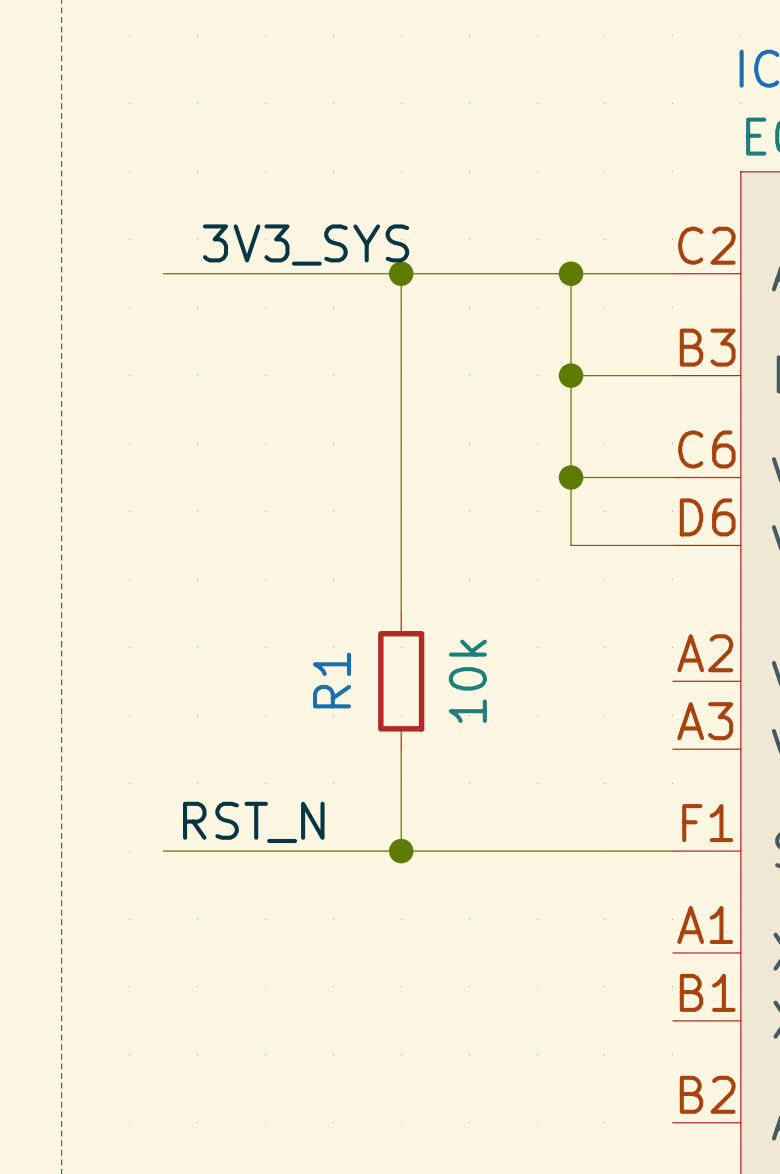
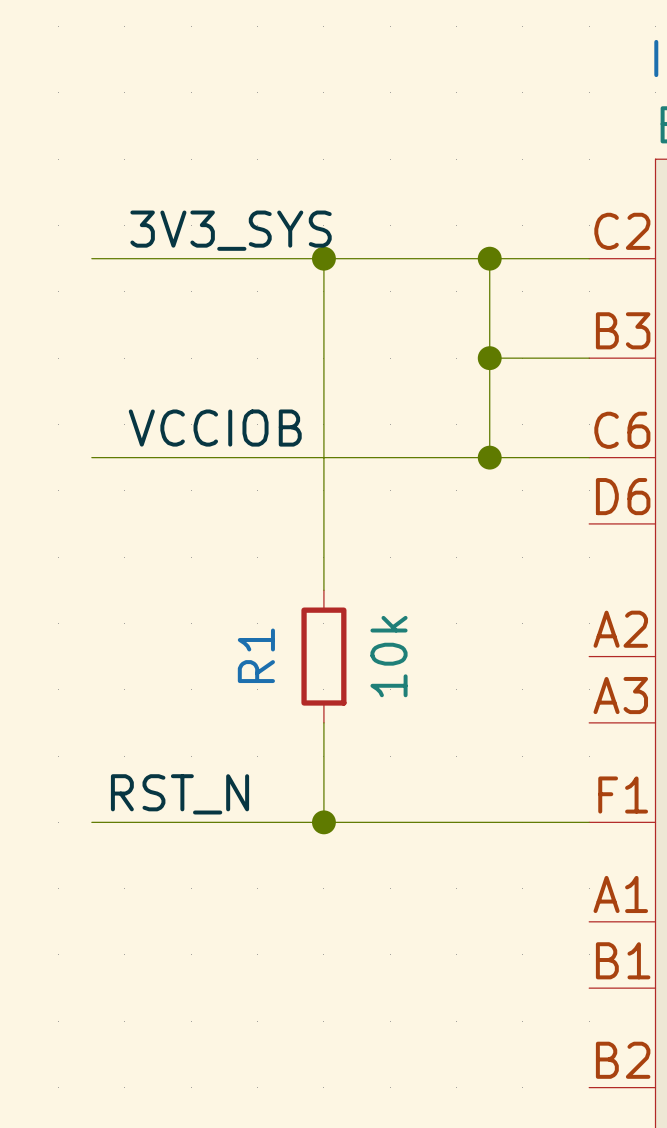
label: none -> VCCIOB (215, 428)
wire: (571, 477) (571, 545) (672, 545) -> (489, 457) (91, 457)

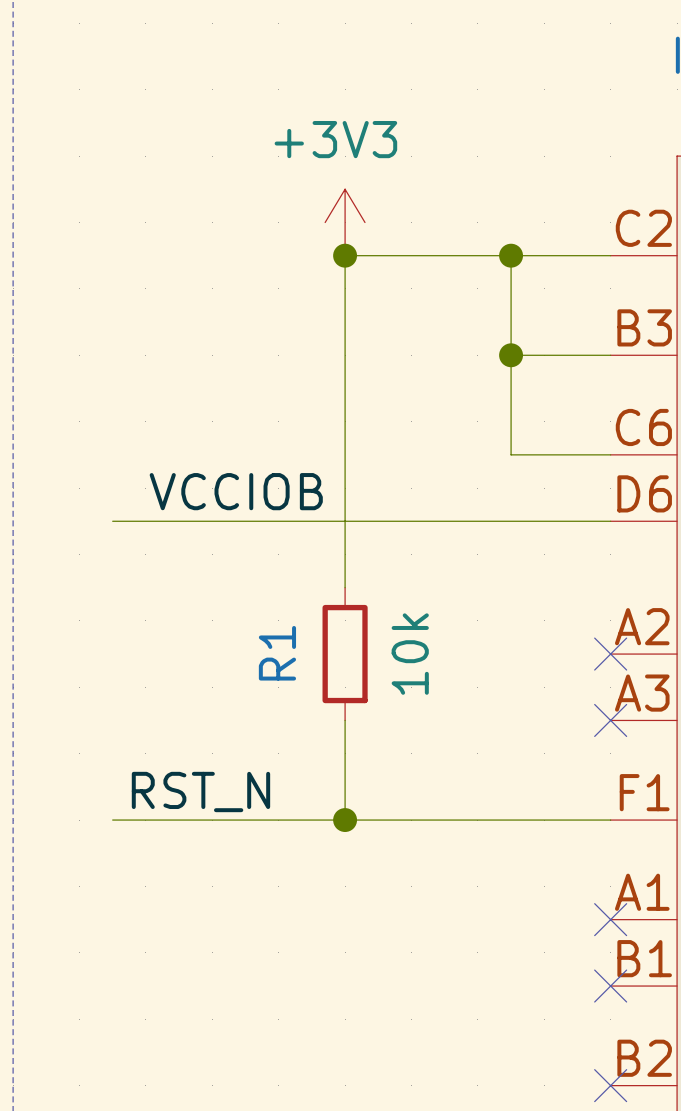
power symbol: none -> +3V3 (345, 222)
label: 3V3_SYS (231, 230) -> none
wire: (91, 258) (323, 258) -> none
label position: VCCIOB (215, 428) -> VCCIOB (236, 491)
wire: (91, 457) (489, 457) -> none
junction: (489, 457) -> none
wire: none -> (112, 521) (610, 521)
no-connect mark: none -> (610, 654)
no-connect mark: none -> (610, 720)
no-connect mark: none -> (610, 919)
no-connect mark: none -> (610, 986)
no-connect mark: none -> (610, 1085)

